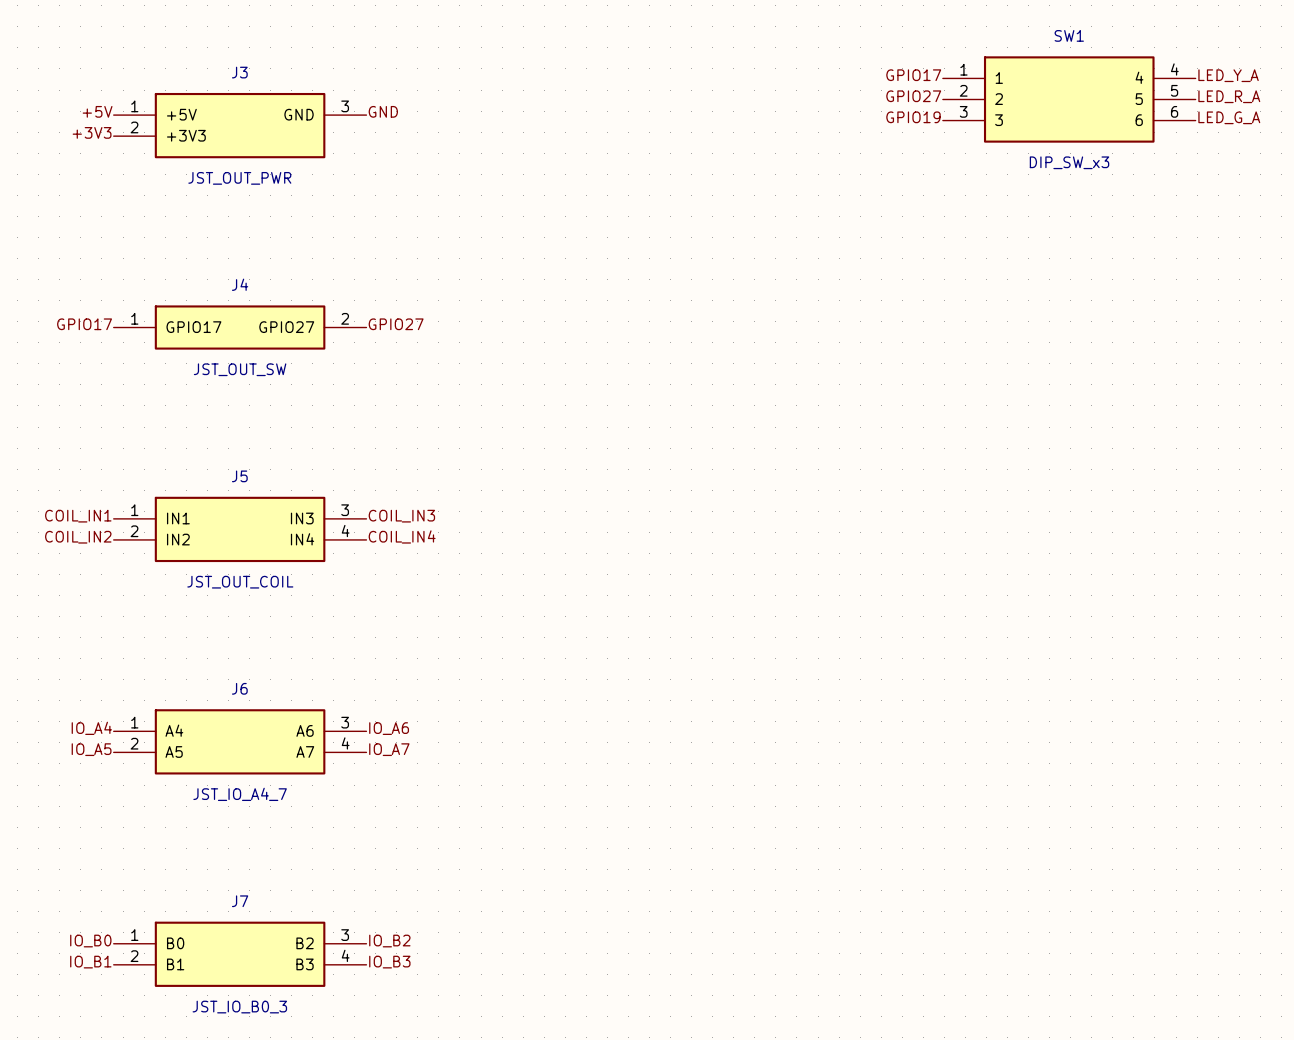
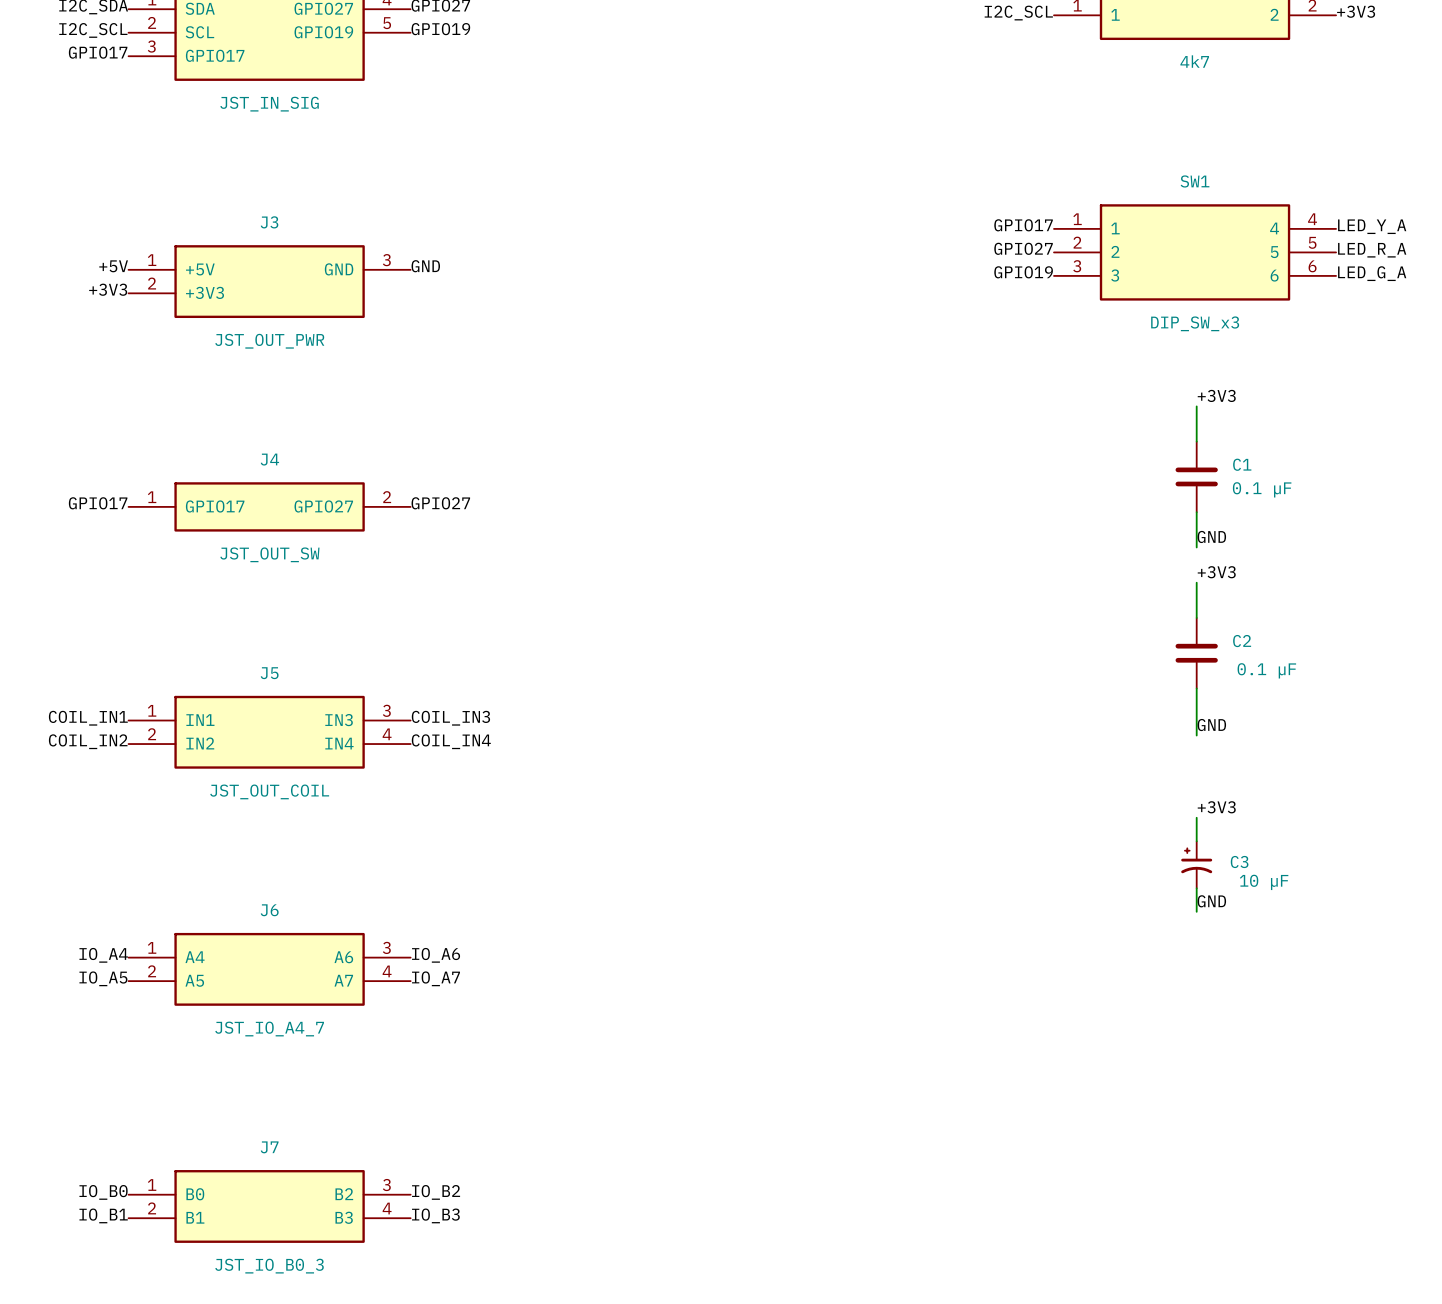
label: none -> +3V3 (1216, 395)
wire: none -> (1196, 406) (1196, 441)
C1: none -> 0.1 µF (1196, 476)
wire: none -> (1196, 512) (1196, 547)
label: none -> GND (1211, 536)
label: none -> +3V3 (1216, 572)
wire: none -> (1196, 582) (1196, 617)
C2: none -> 0.1 µF (1196, 653)
wire: none -> (1196, 688) (1196, 735)
label: none -> GND (1211, 725)
label: none -> +3V3 (1216, 807)
wire: none -> (1196, 817) (1196, 841)
C3: none -> 10 µF (1196, 864)
wire: none -> (1196, 888) (1196, 911)
label: none -> GND (1211, 901)

